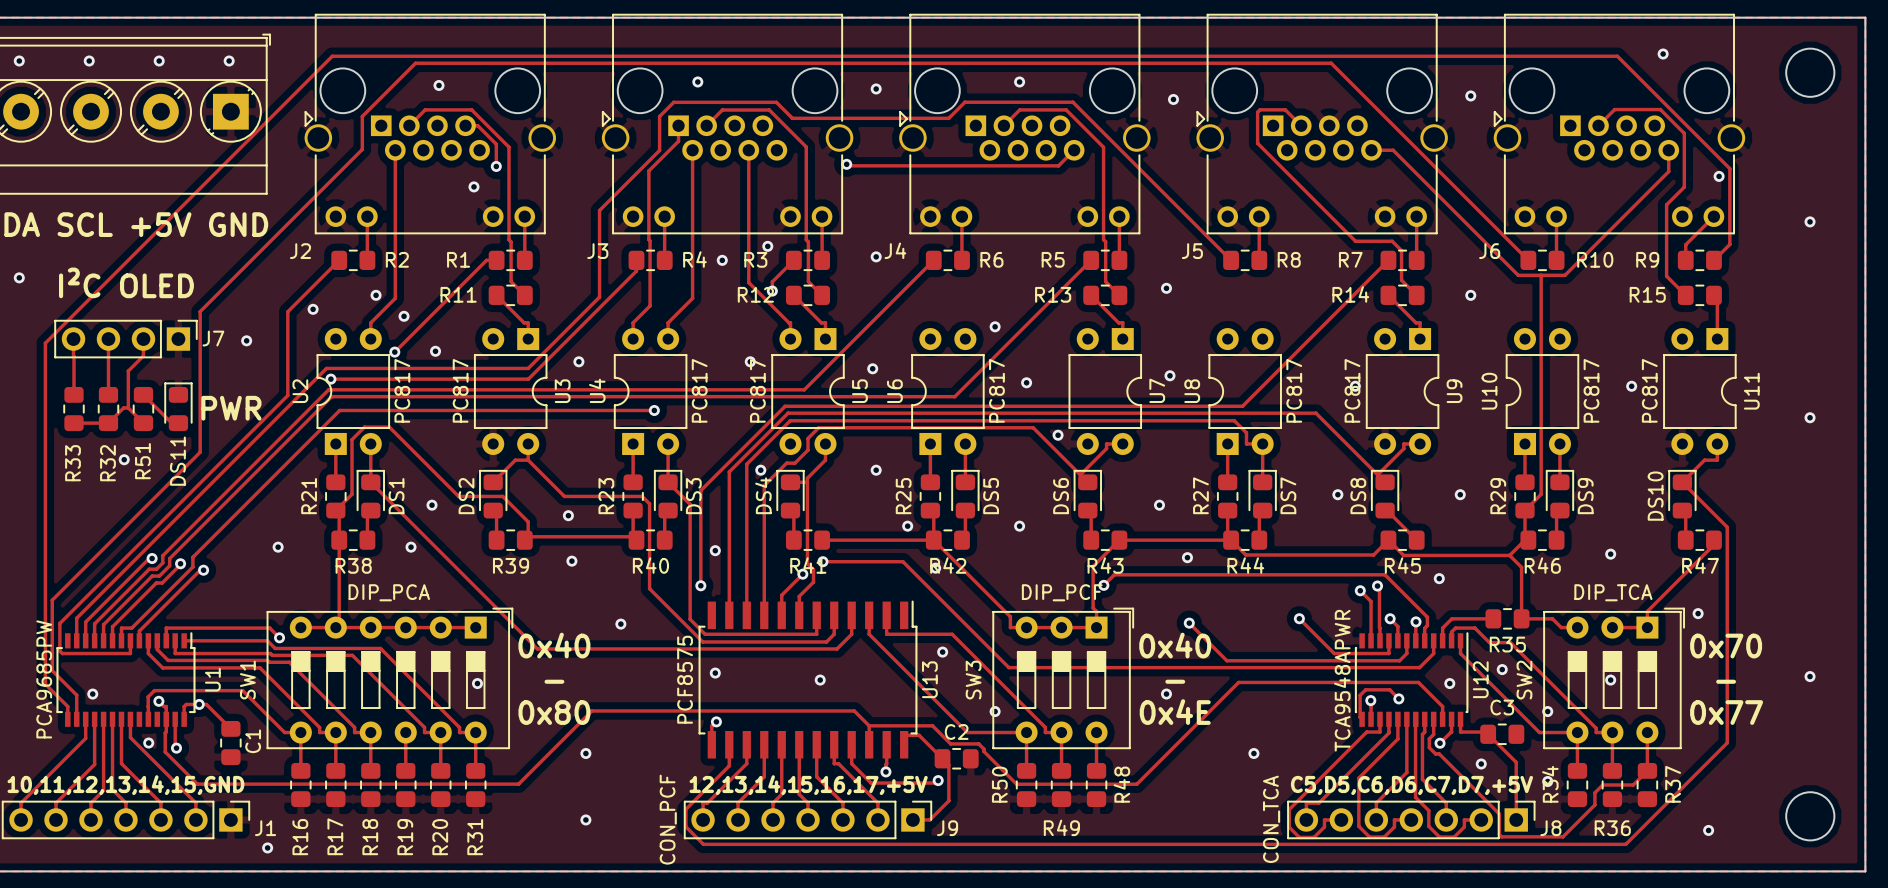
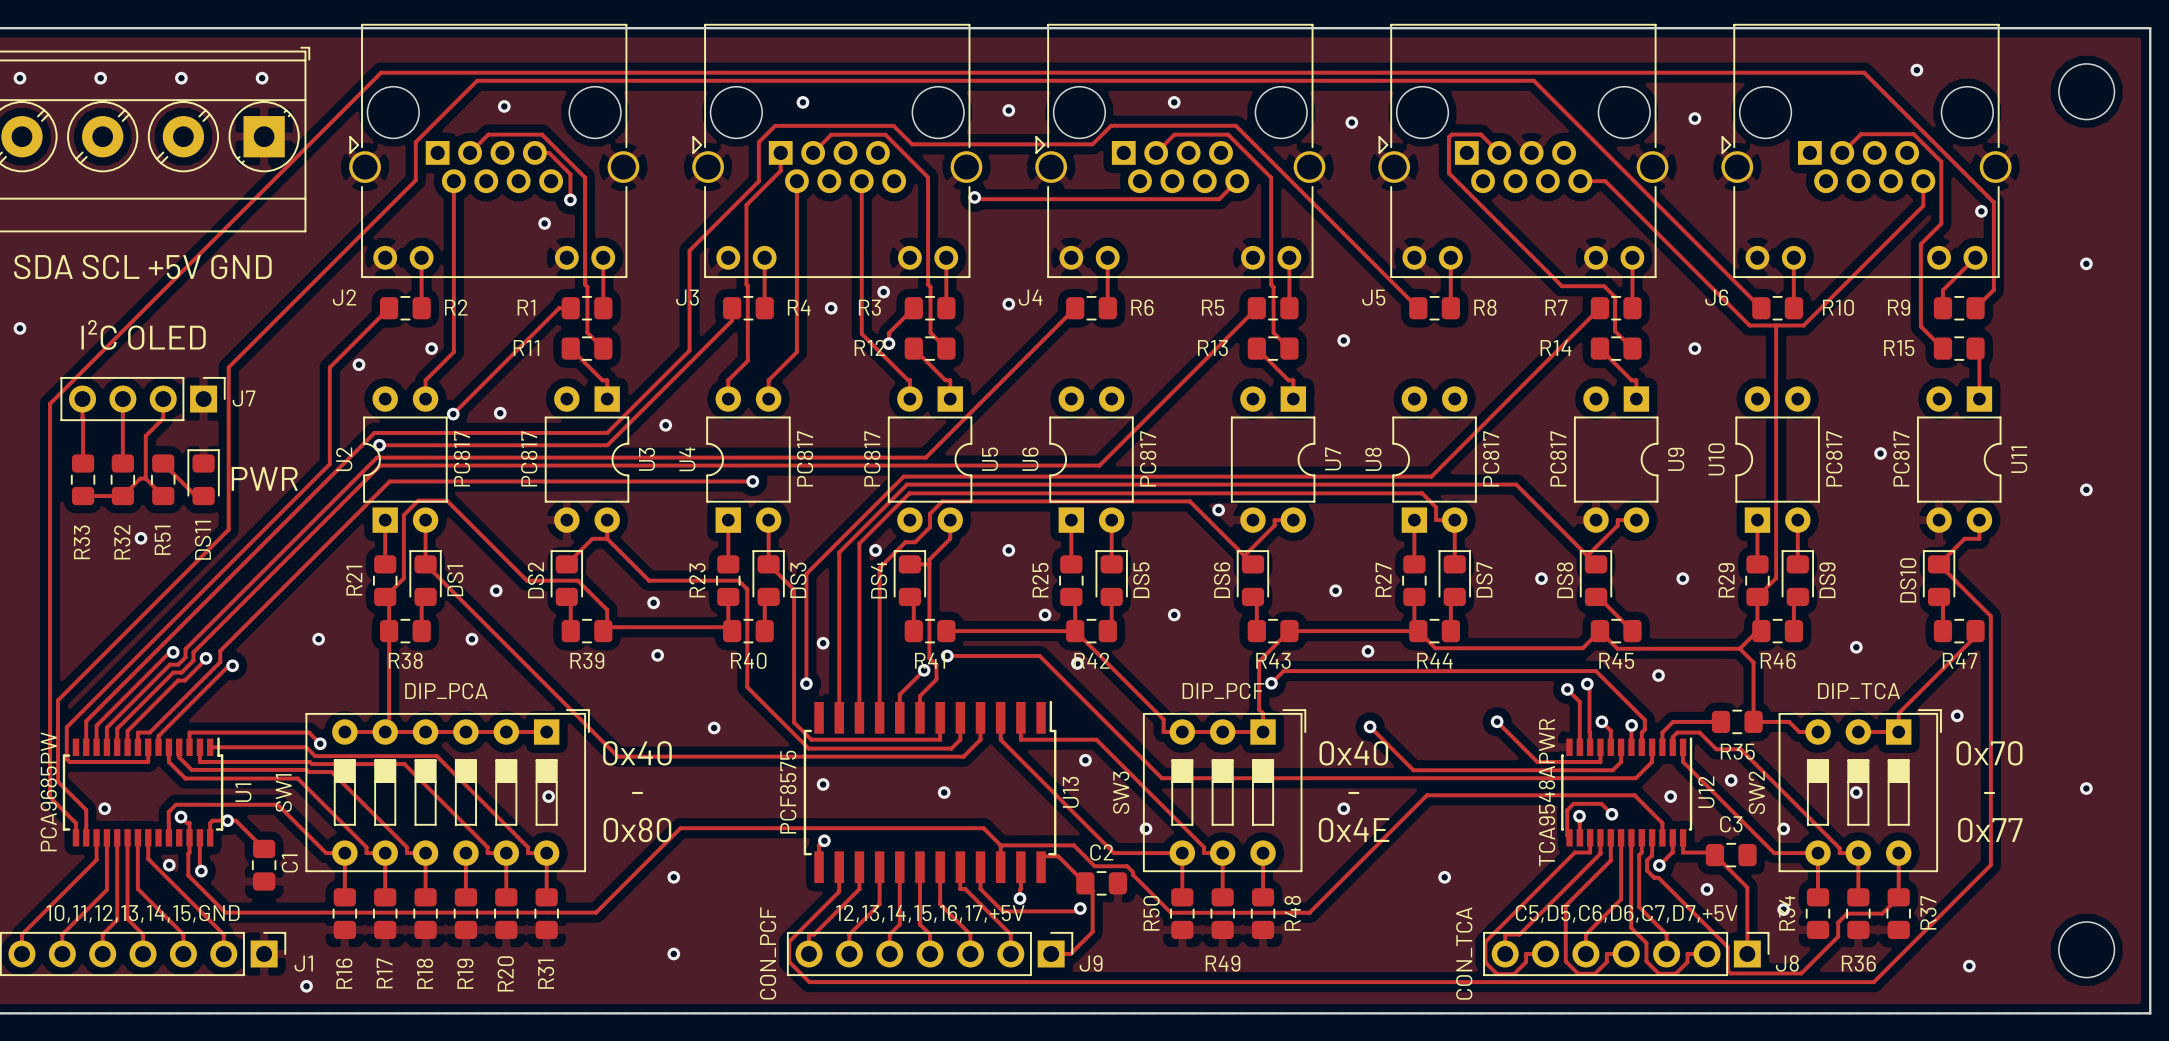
via: (404, 316) -> none
via: (995, 326) -> none
via: (246, 340) -> none
via: (750, 361) -> none
via: (872, 368) -> none
via: (1169, 375) -> none
via: (1026, 382) -> none
via: (1355, 386) -> none

